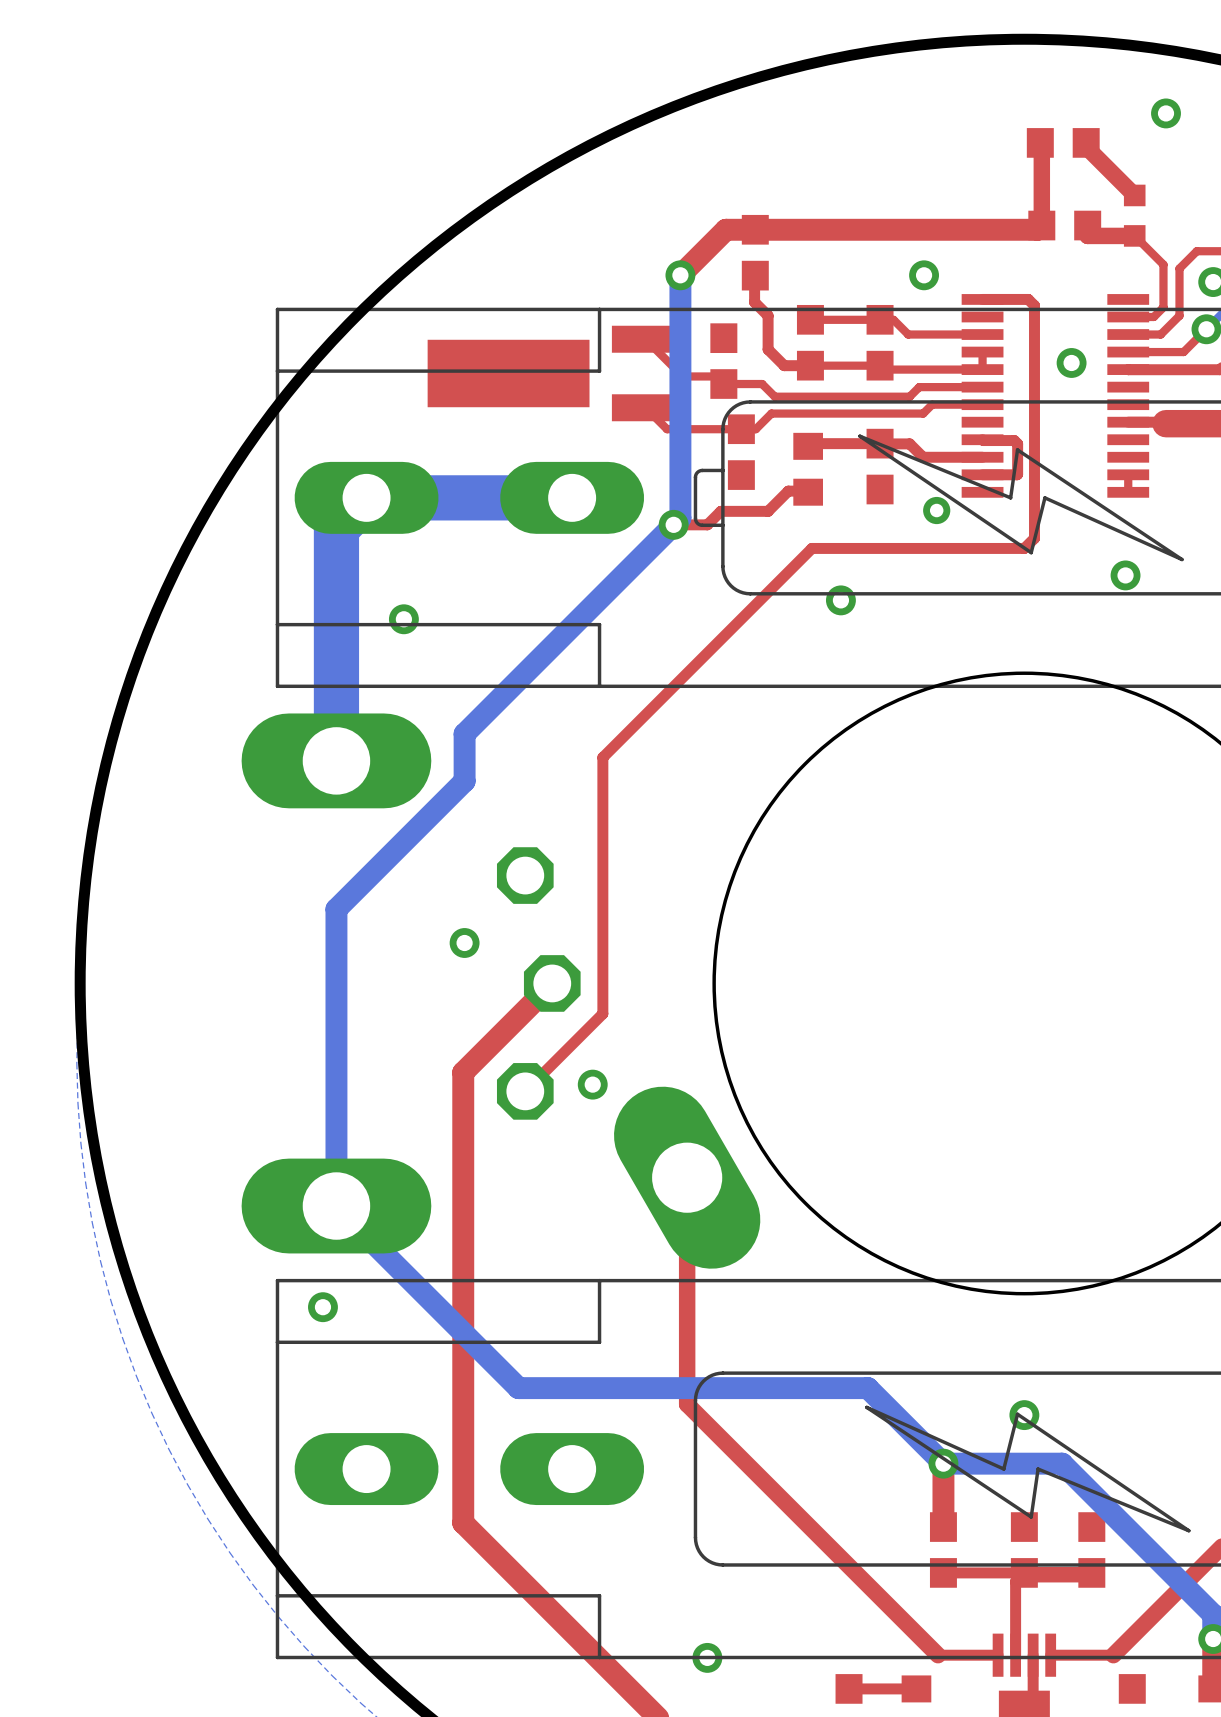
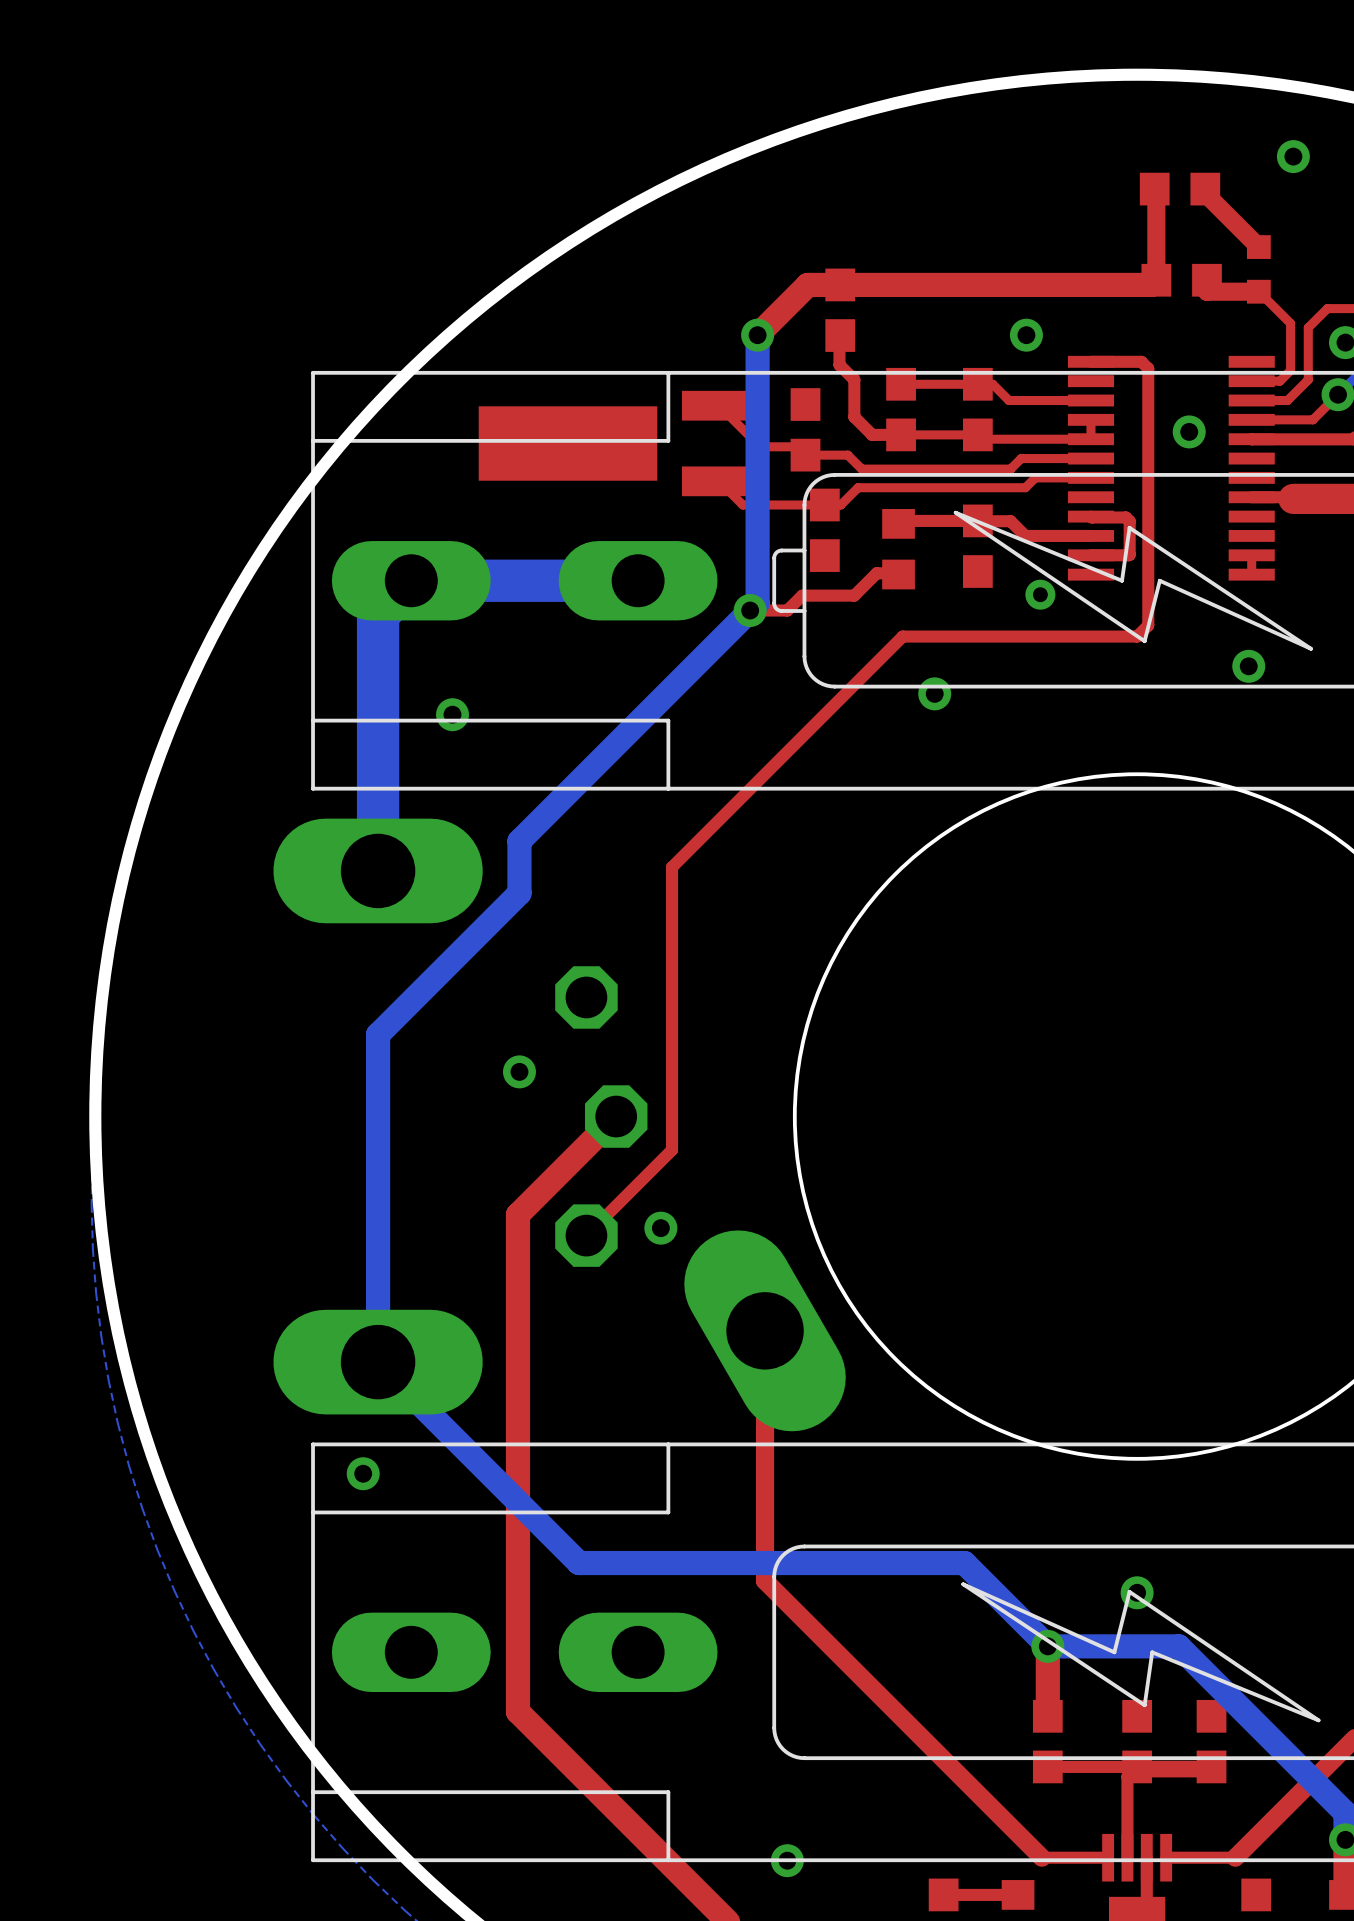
bottom track width: thick (572, 497) (366, 497) (336, 527) (336, 760) -> thin (638, 580) (411, 580) (378, 613) (378, 870)

